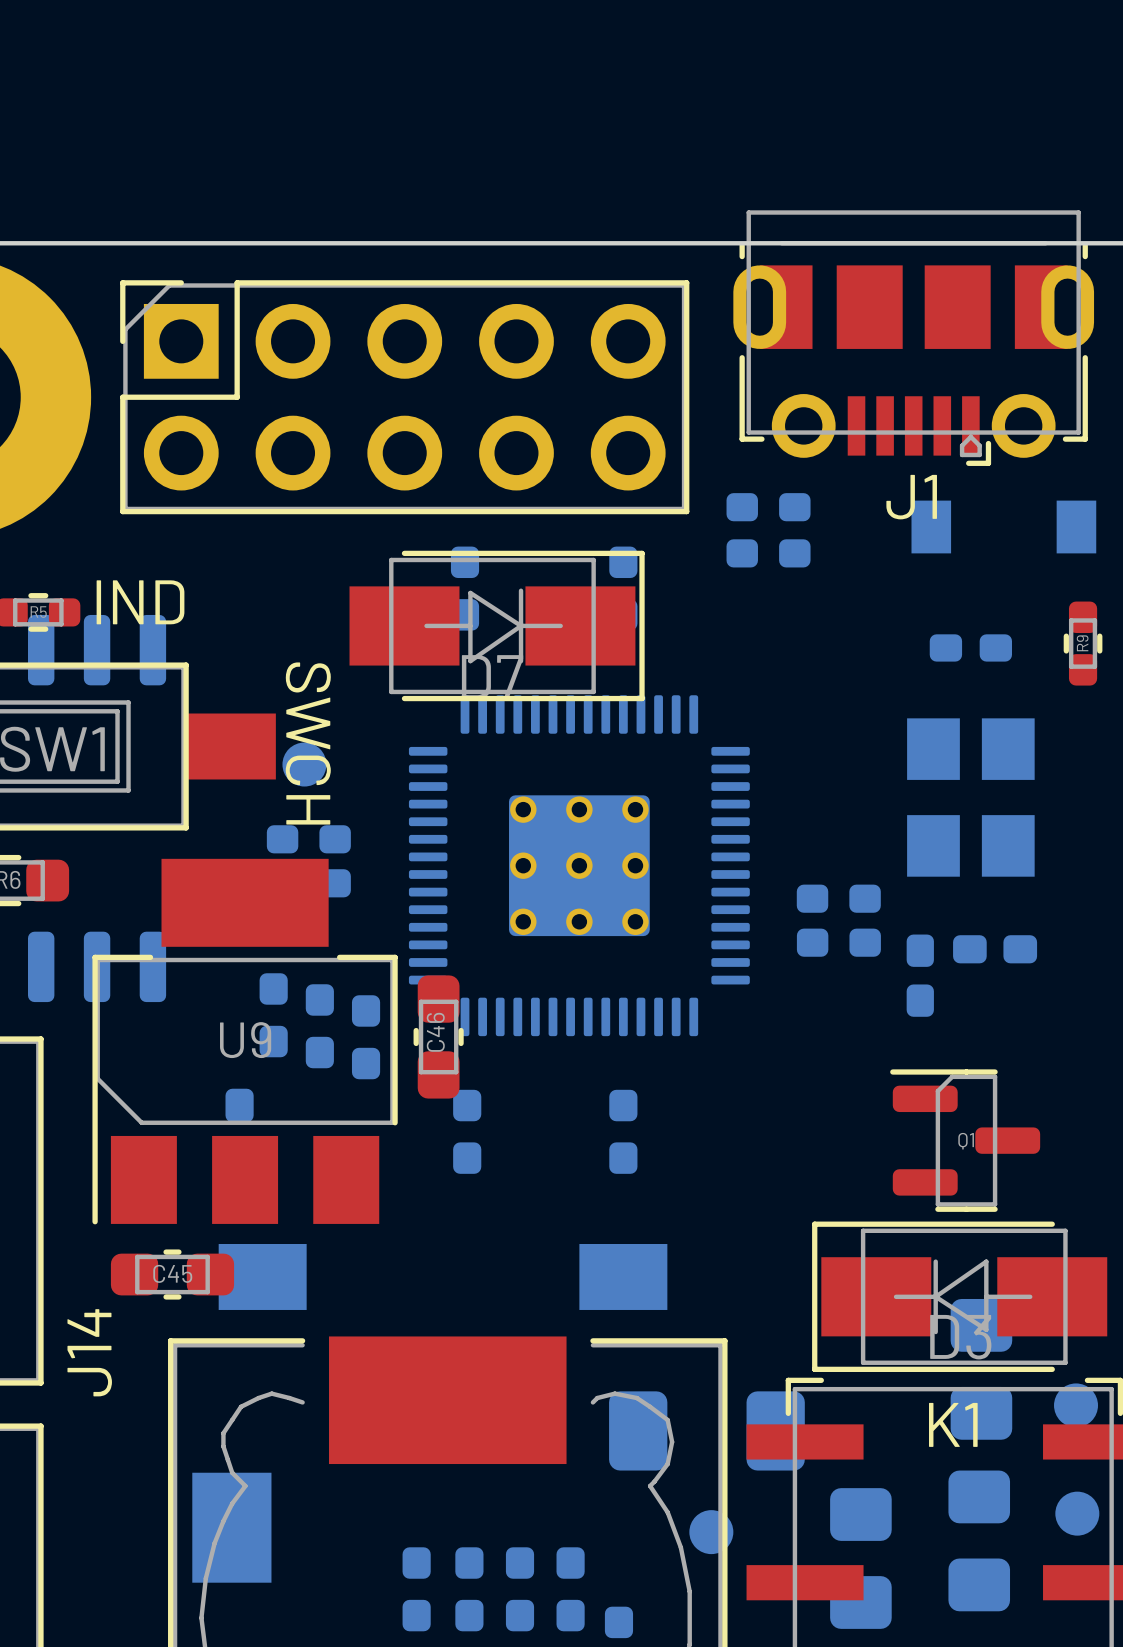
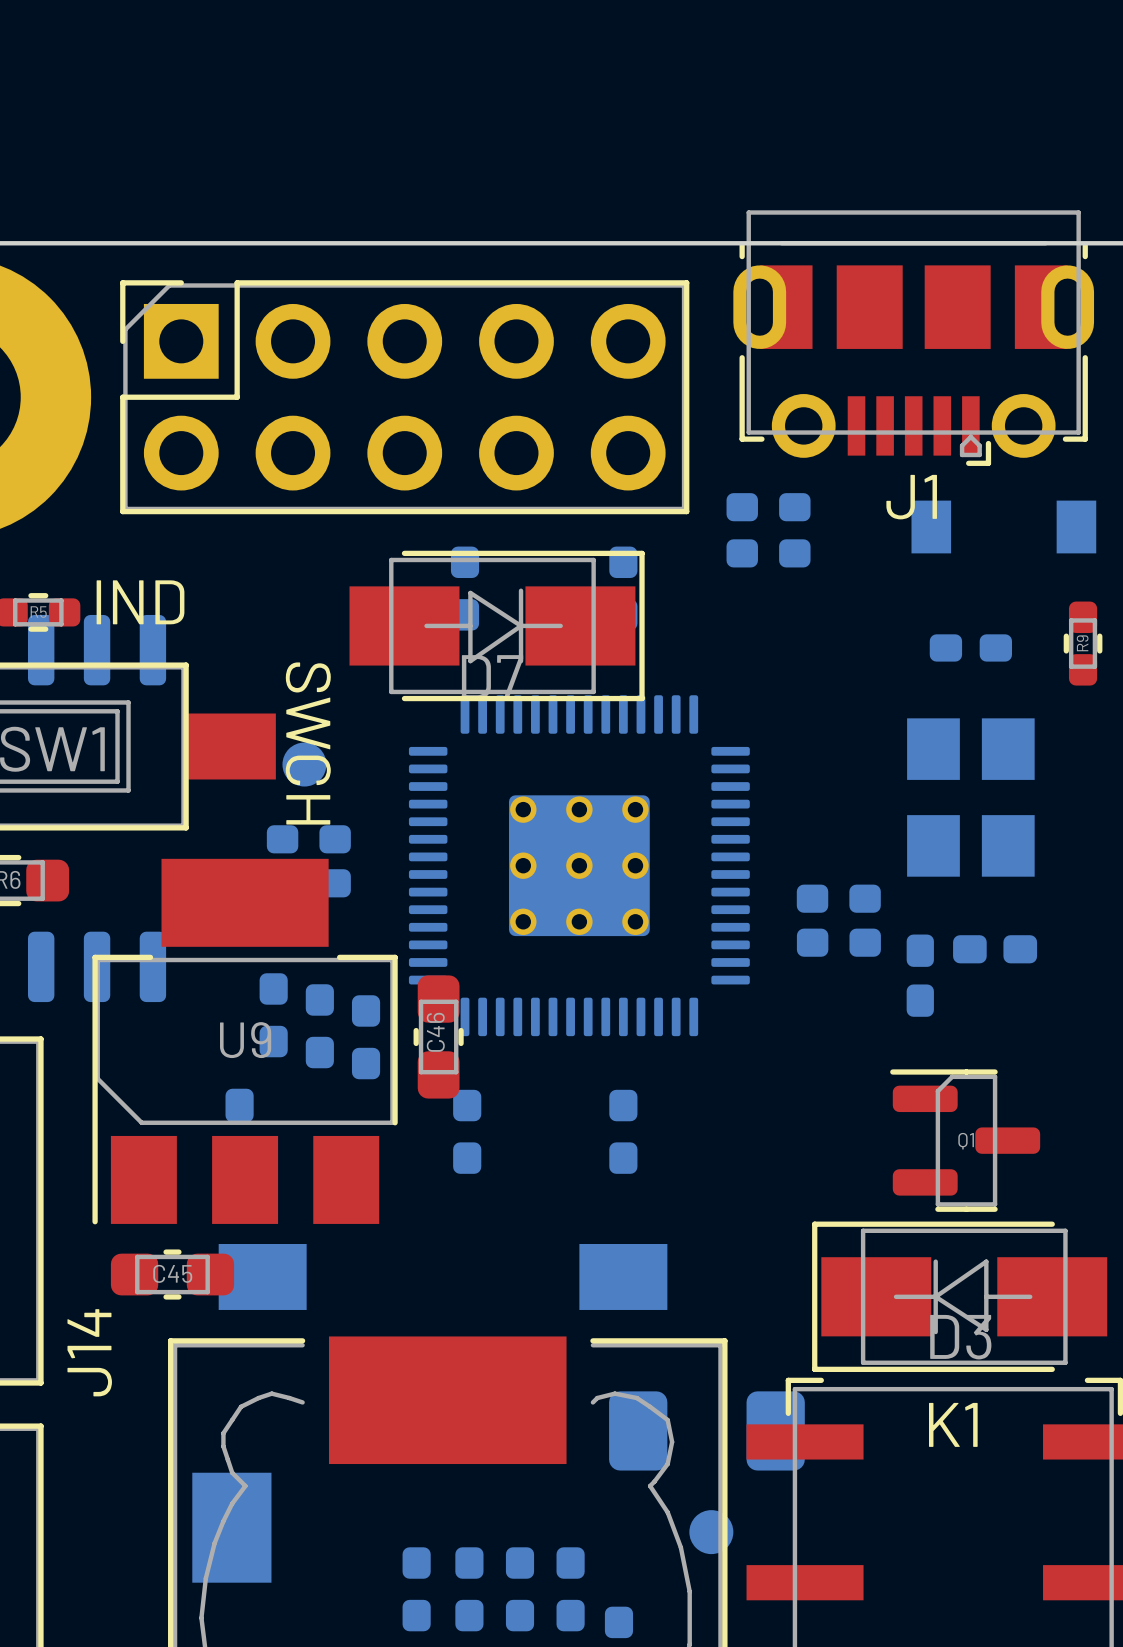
part: (981, 1369) -> none
part: (1076, 1405) -> none
part: (1077, 1513) -> none
part: (979, 1540) -> none
part: (860, 1558) -> none

